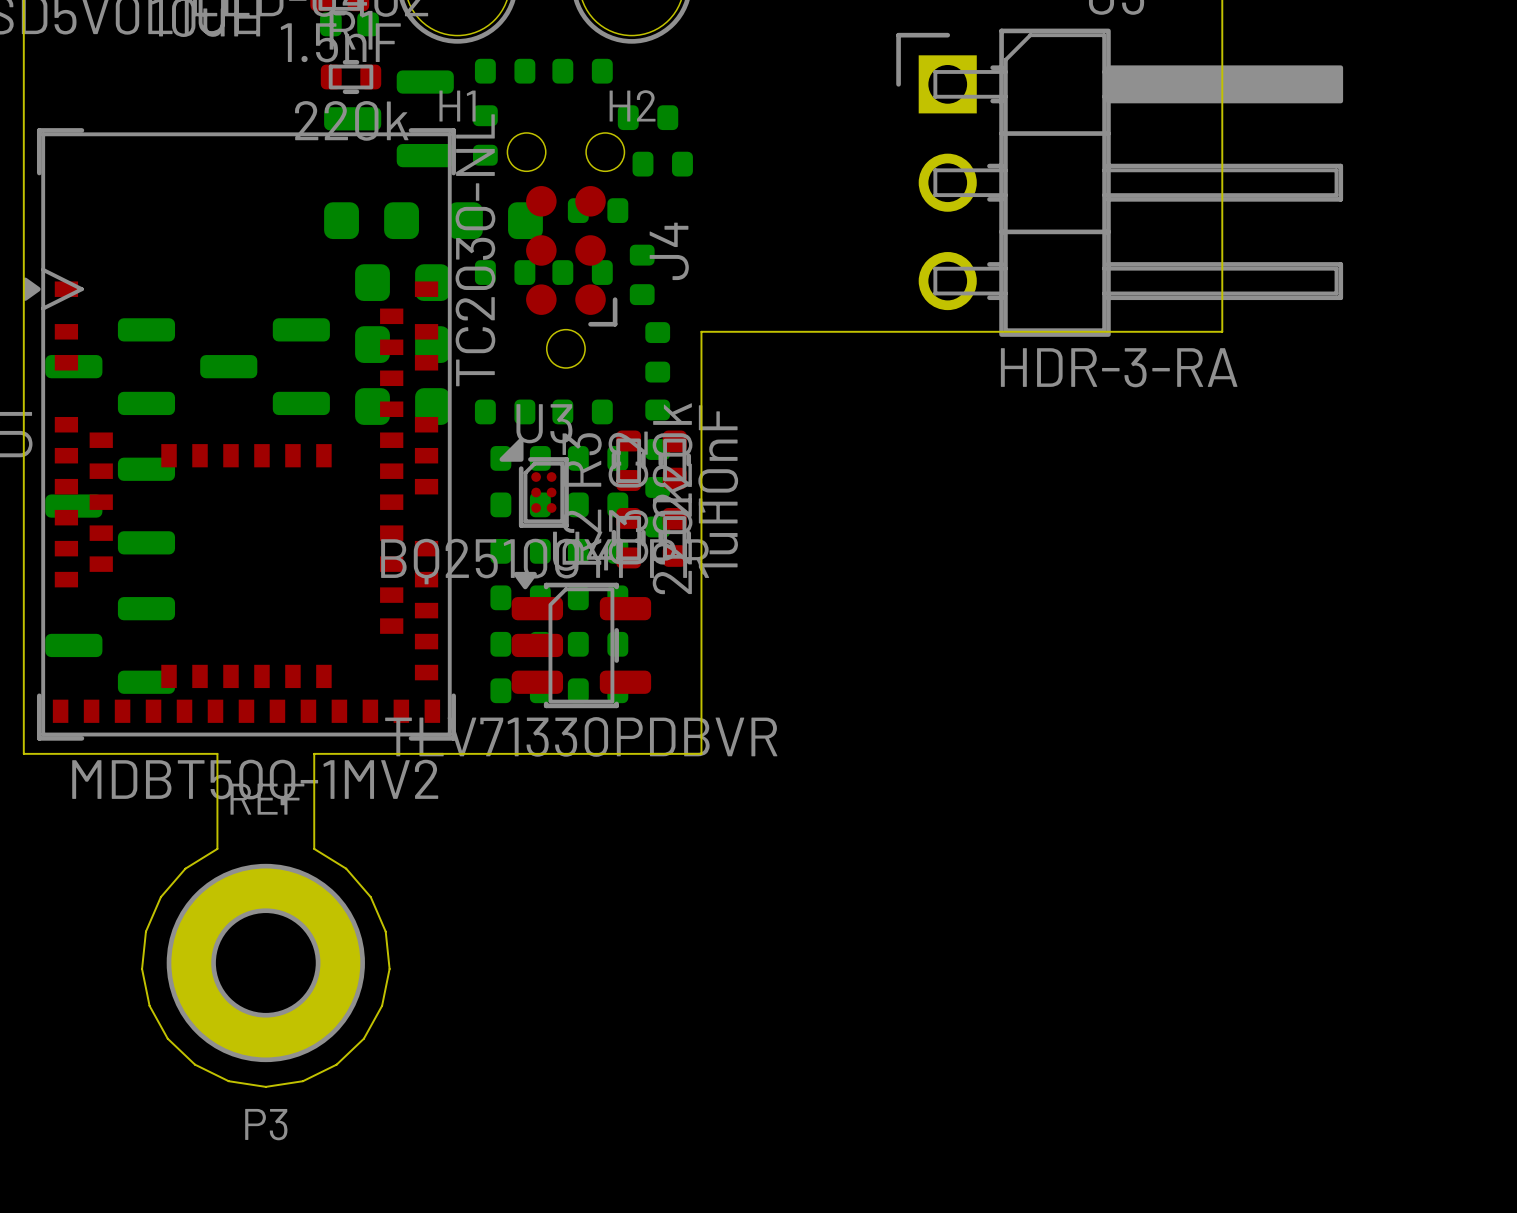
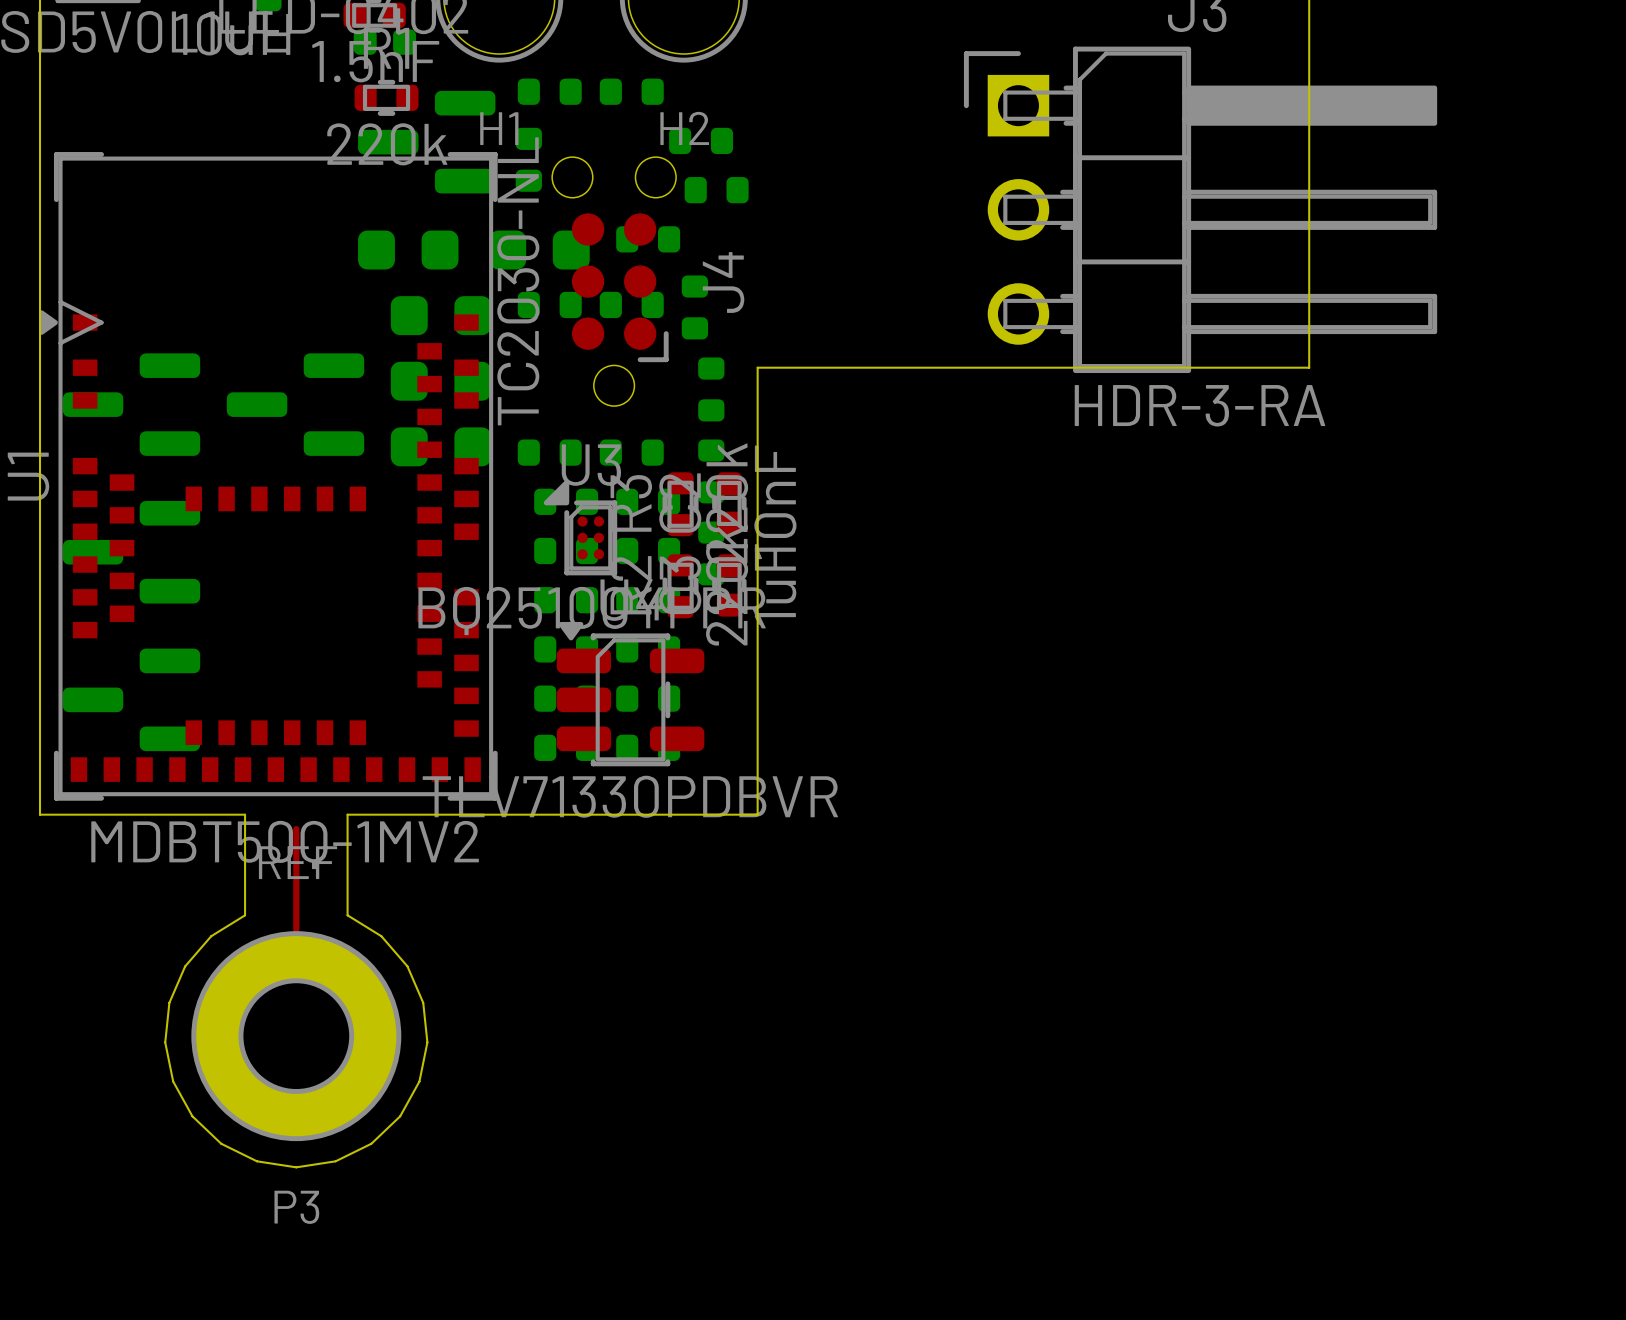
top track: none -> (296, 829) (296, 1036)

